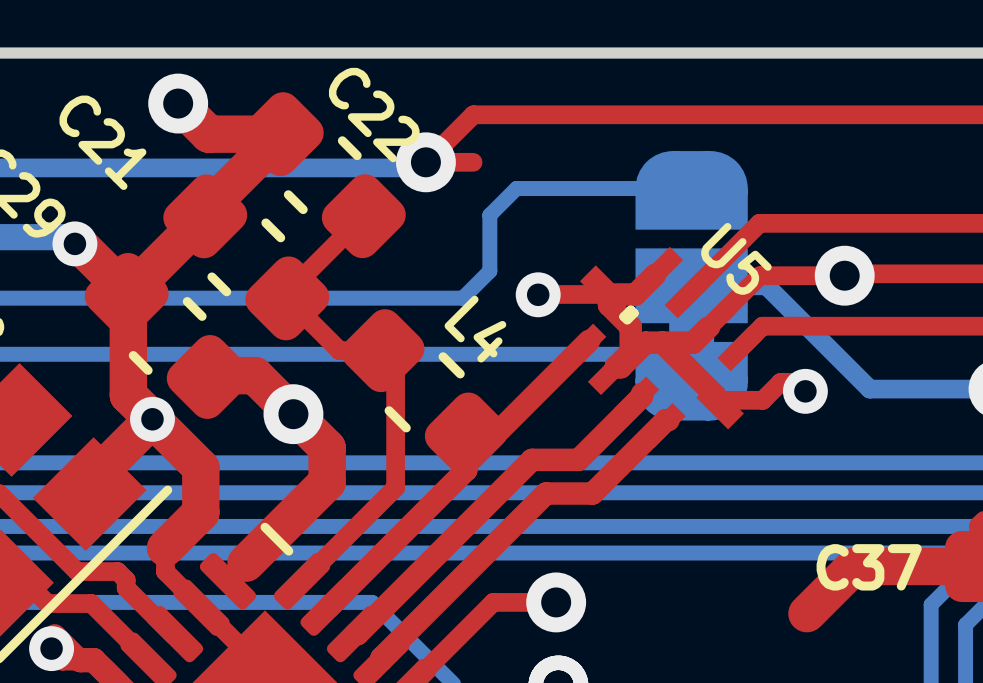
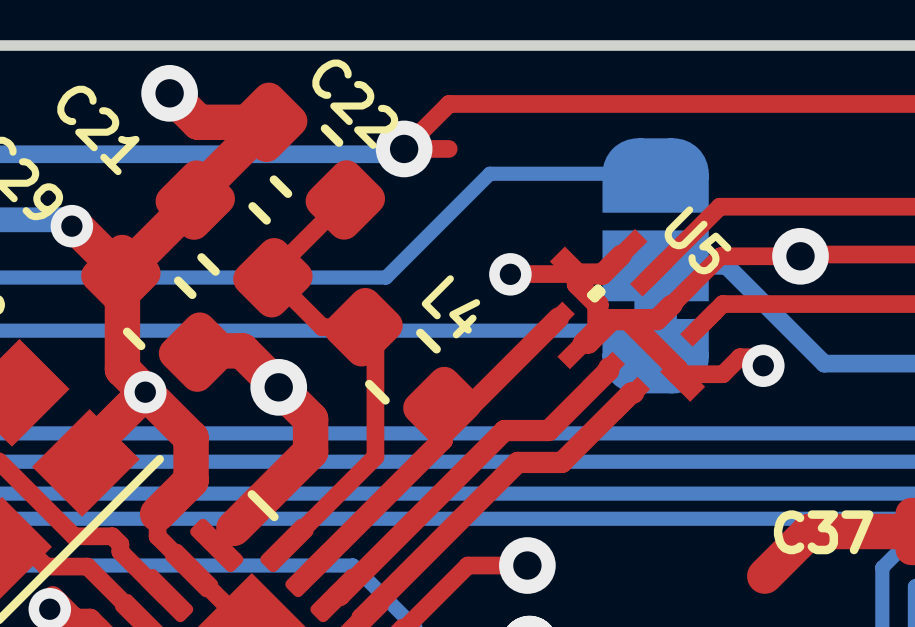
bottom track: (489, 215) (489, 271) (462, 298) (406, 298) -> (464, 198) (386, 277)

